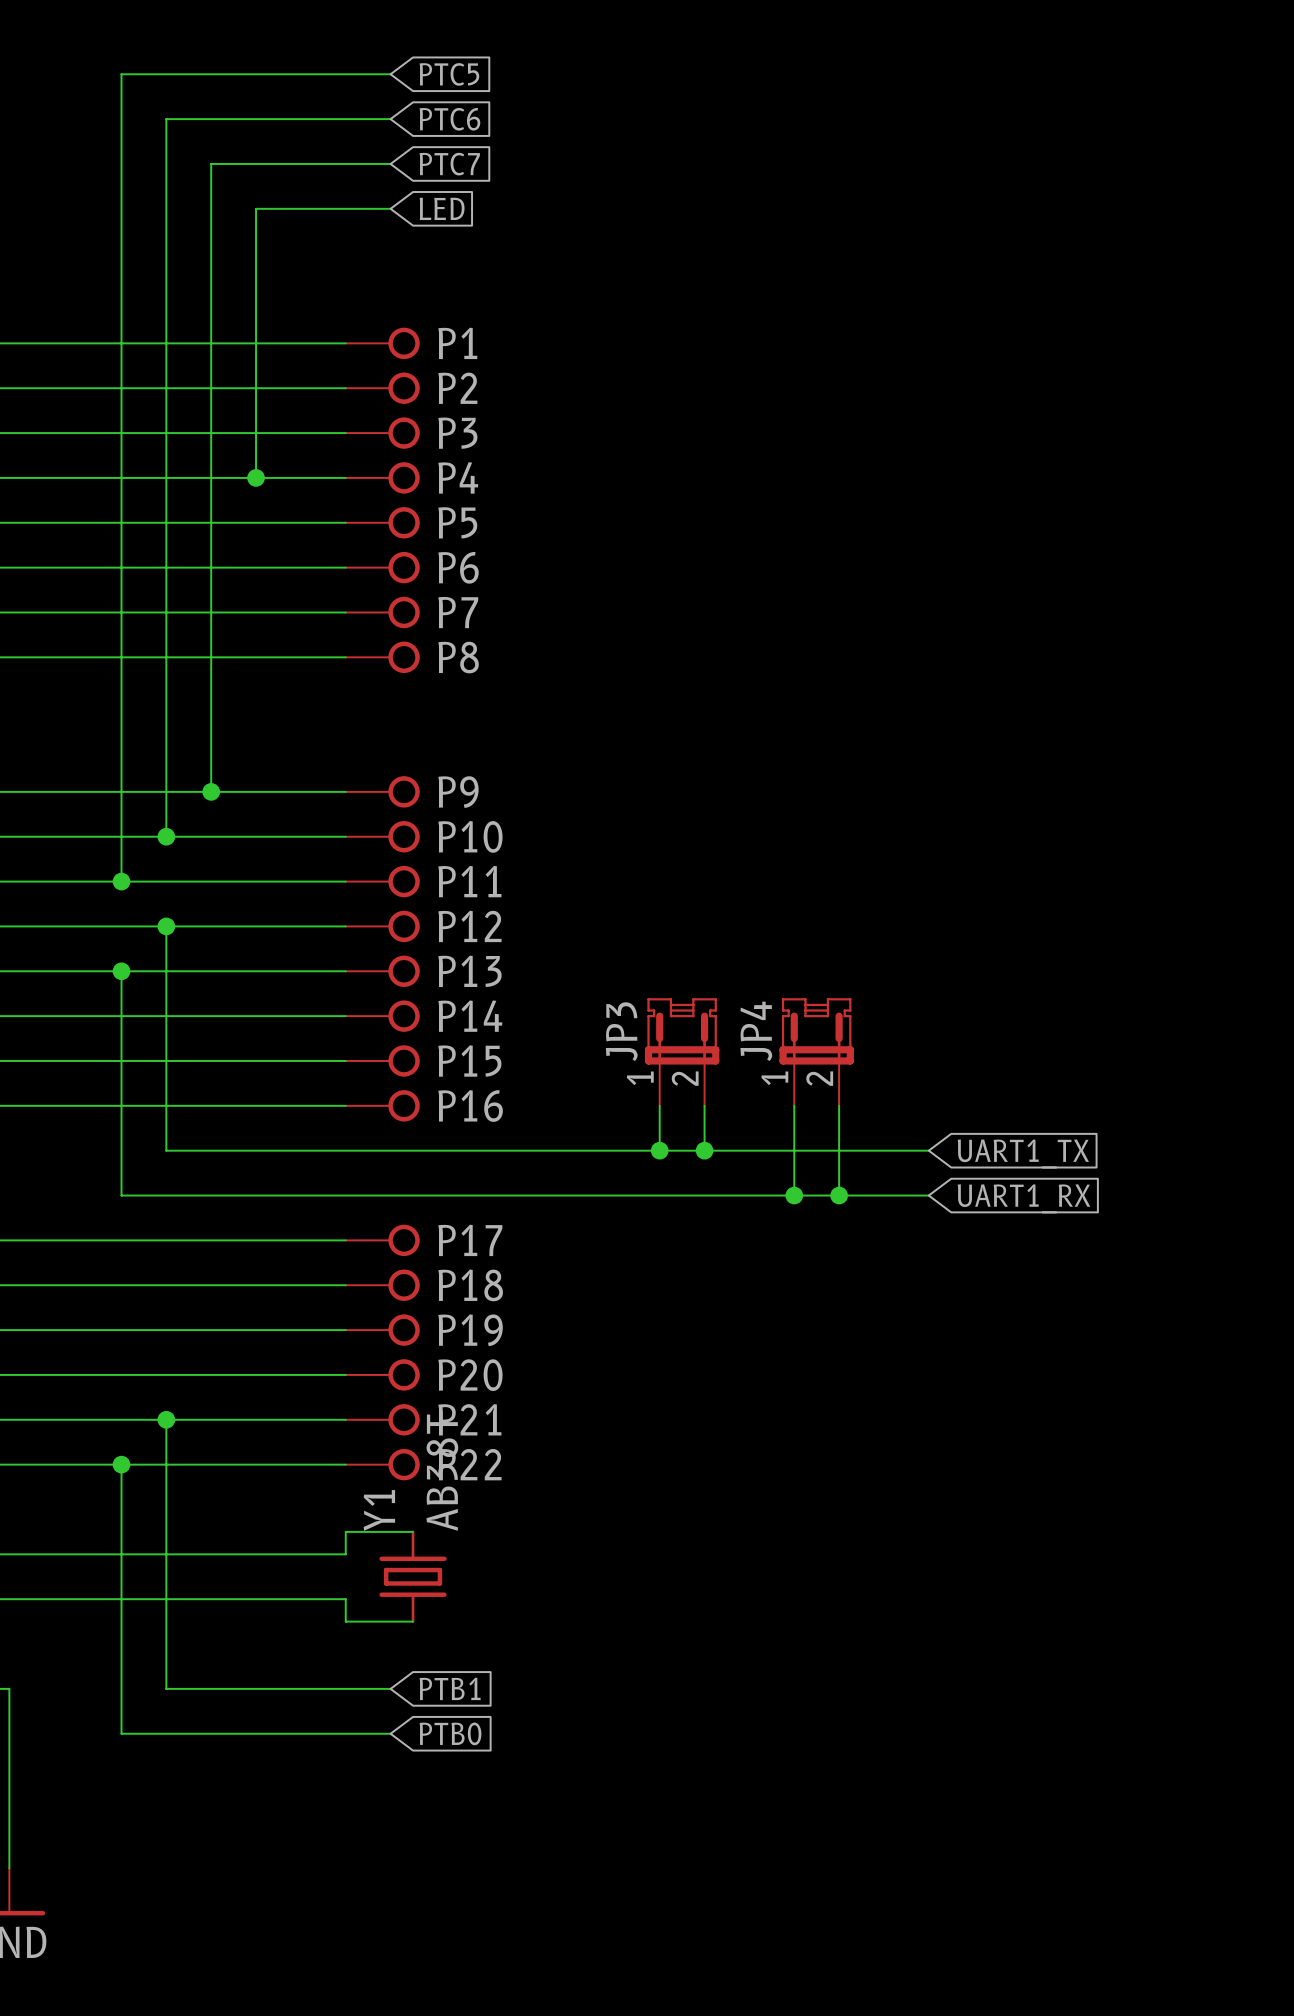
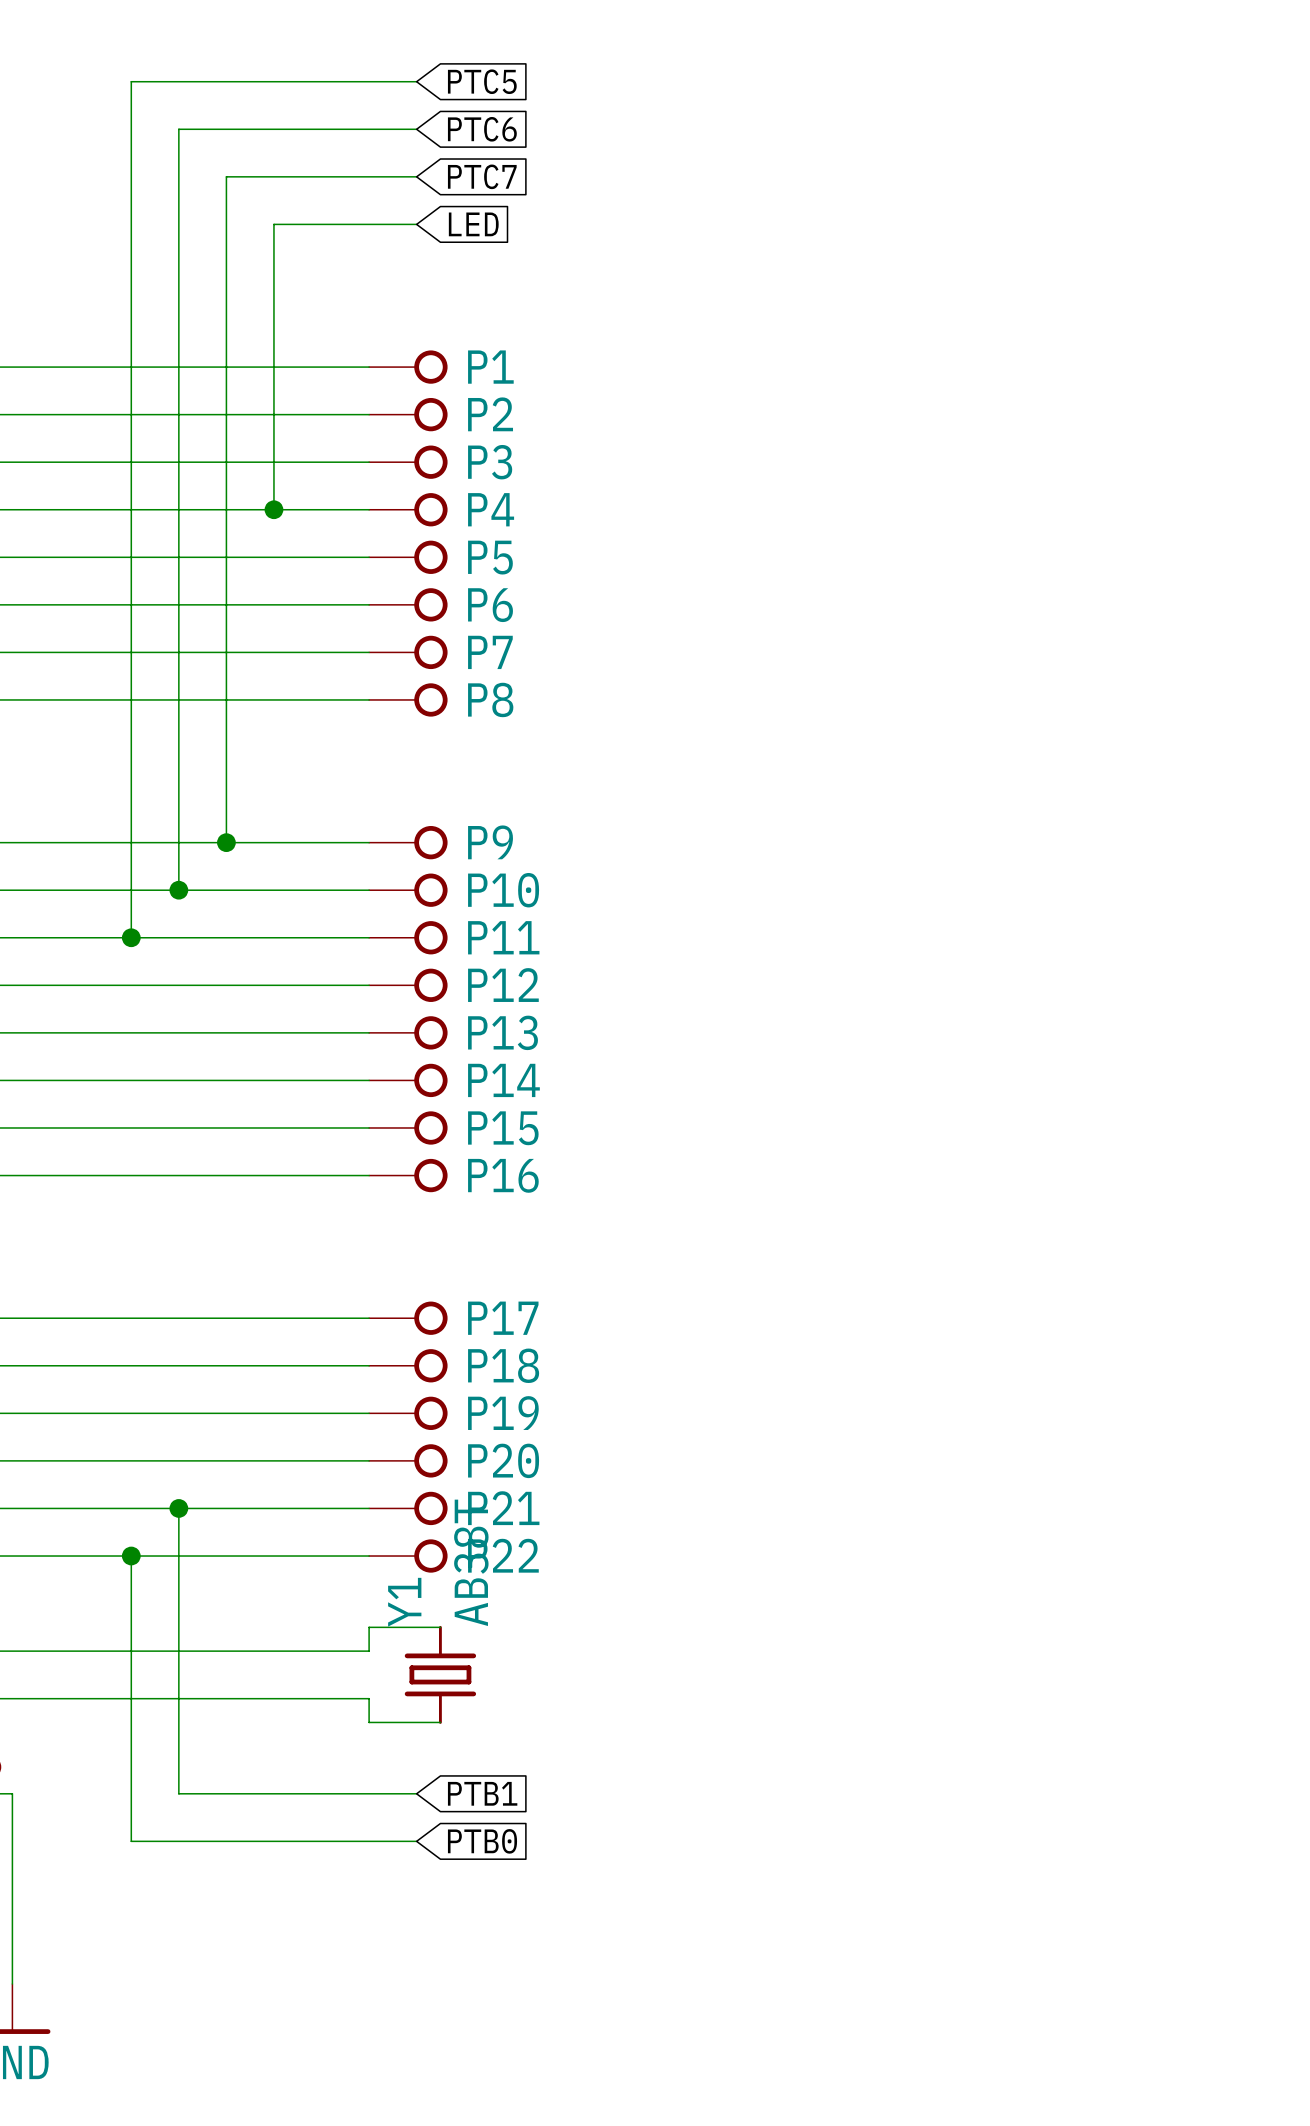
wire: (166, 926) (166, 1150) (928, 1150) -> none
junction: (166, 926) -> none
wire: (121, 971) (121, 1195) (928, 1195) -> none
junction: (121, 971) -> none
part: (682, 1030) -> none
part: (816, 1030) -> none
JP3: (682, 1059) -> none
JP4: (816, 1059) -> none
wire: (659, 1105) (659, 1150) -> none
wire: (704, 1105) (704, 1150) -> none
wire: (794, 1105) (794, 1195) -> none
wire: (839, 1105) (839, 1195) -> none
junction: (659, 1150) -> none
junction: (704, 1150) -> none
global label: UART1_TX (1023, 1154) -> none
junction: (794, 1195) -> none
junction: (839, 1195) -> none
global label: UART1_RX (1024, 1198) -> none

